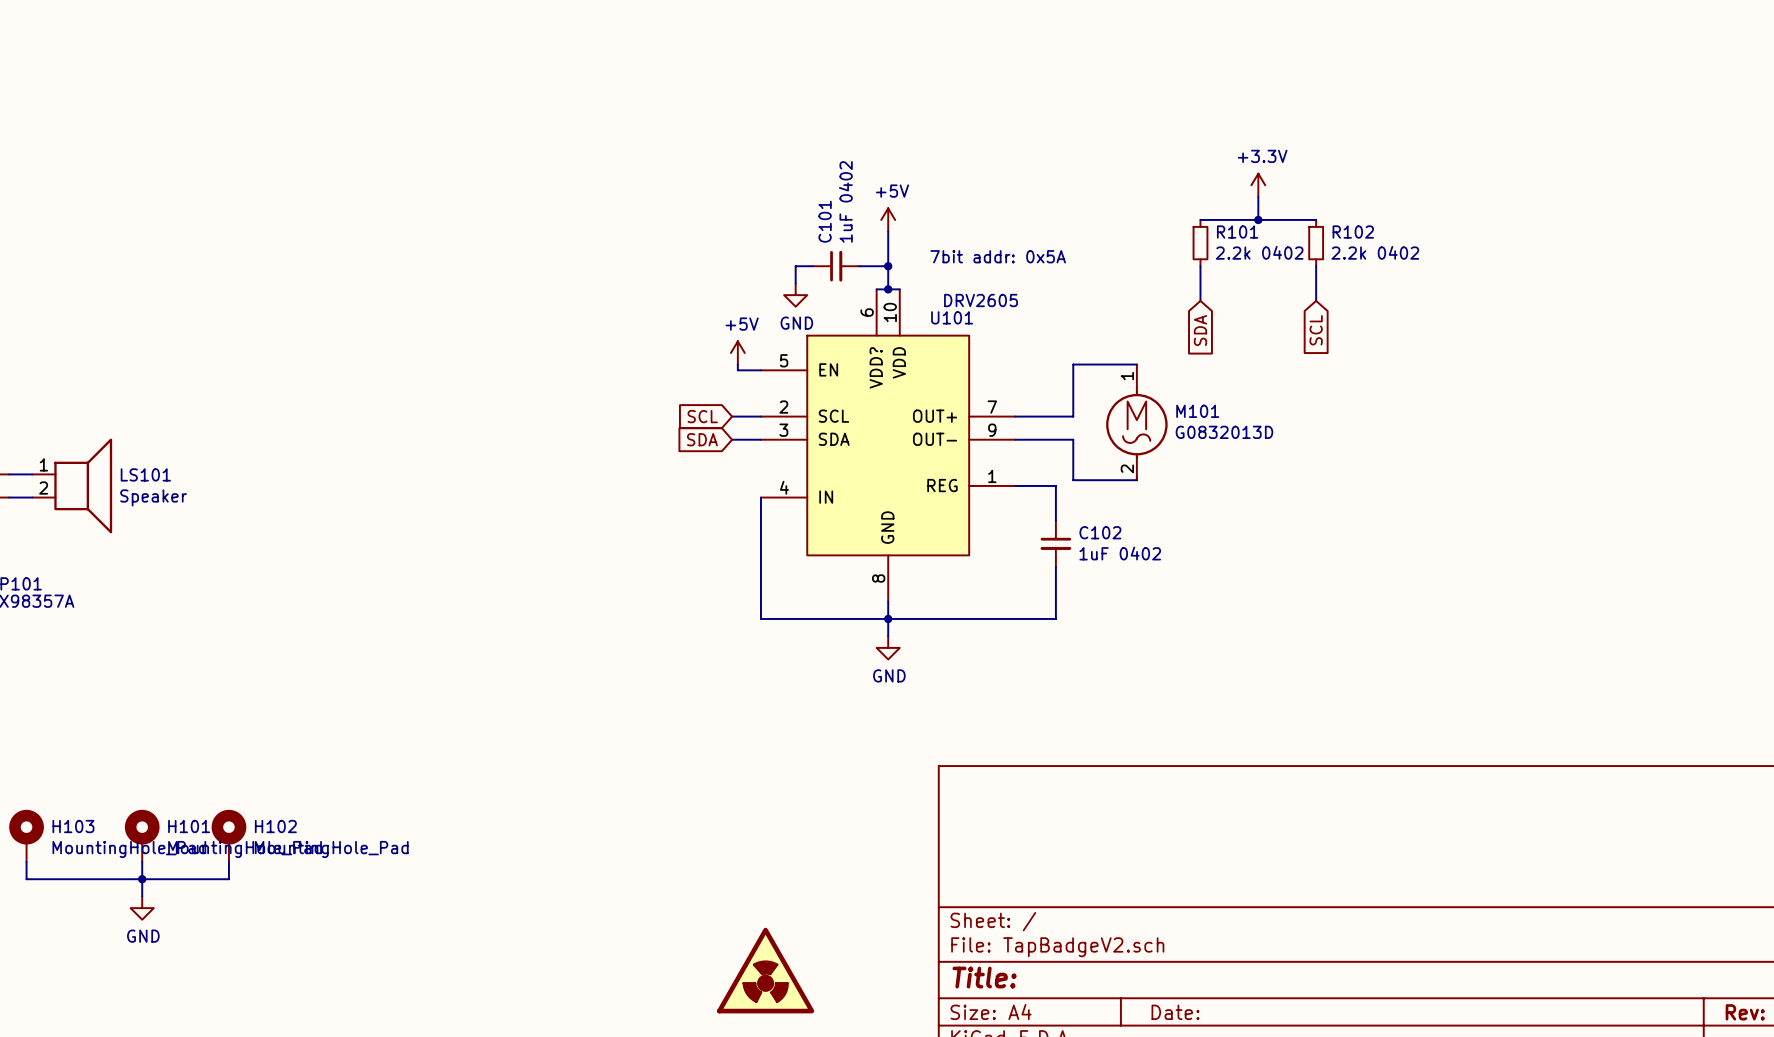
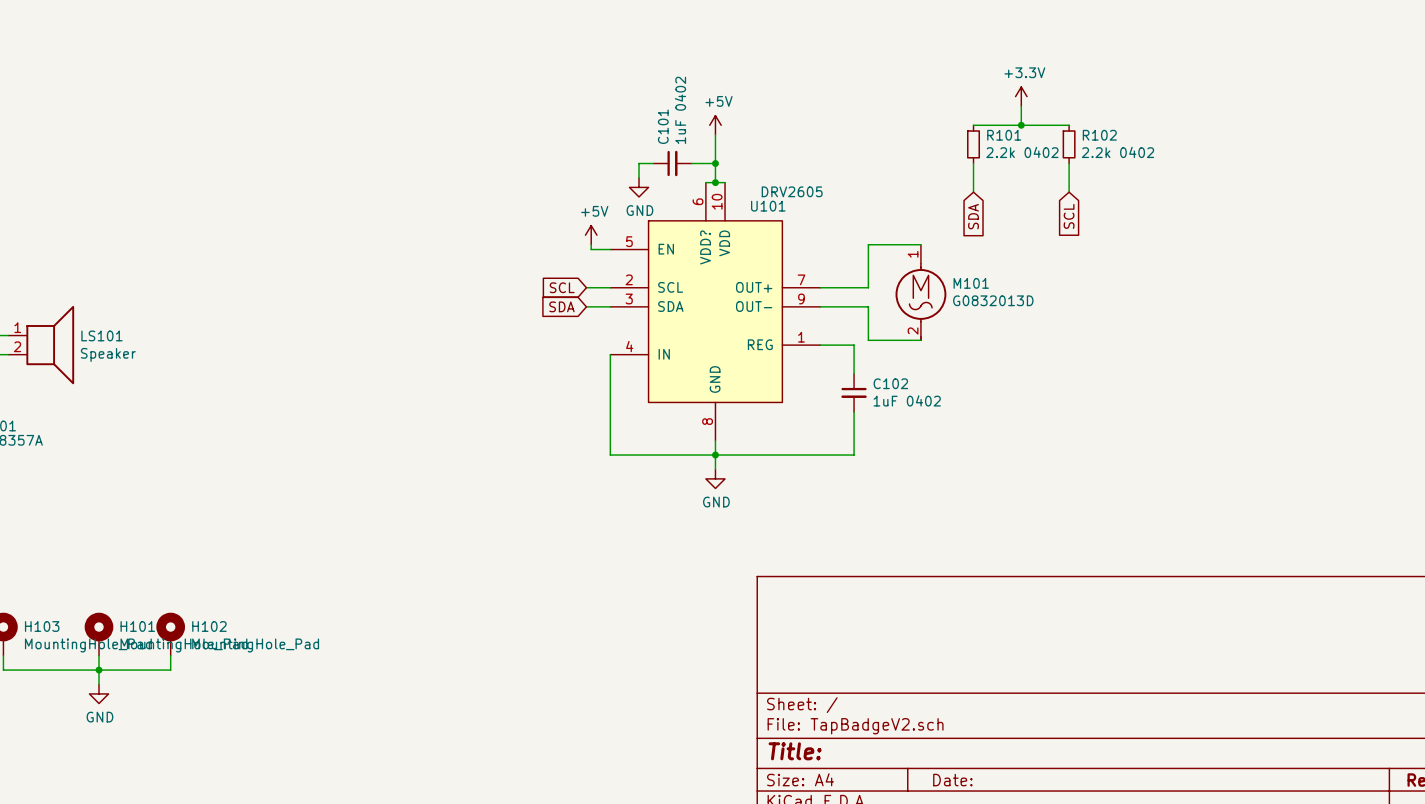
text: 7bit addr: 0x5A (998, 256) -> none
part: (765, 970) -> none

